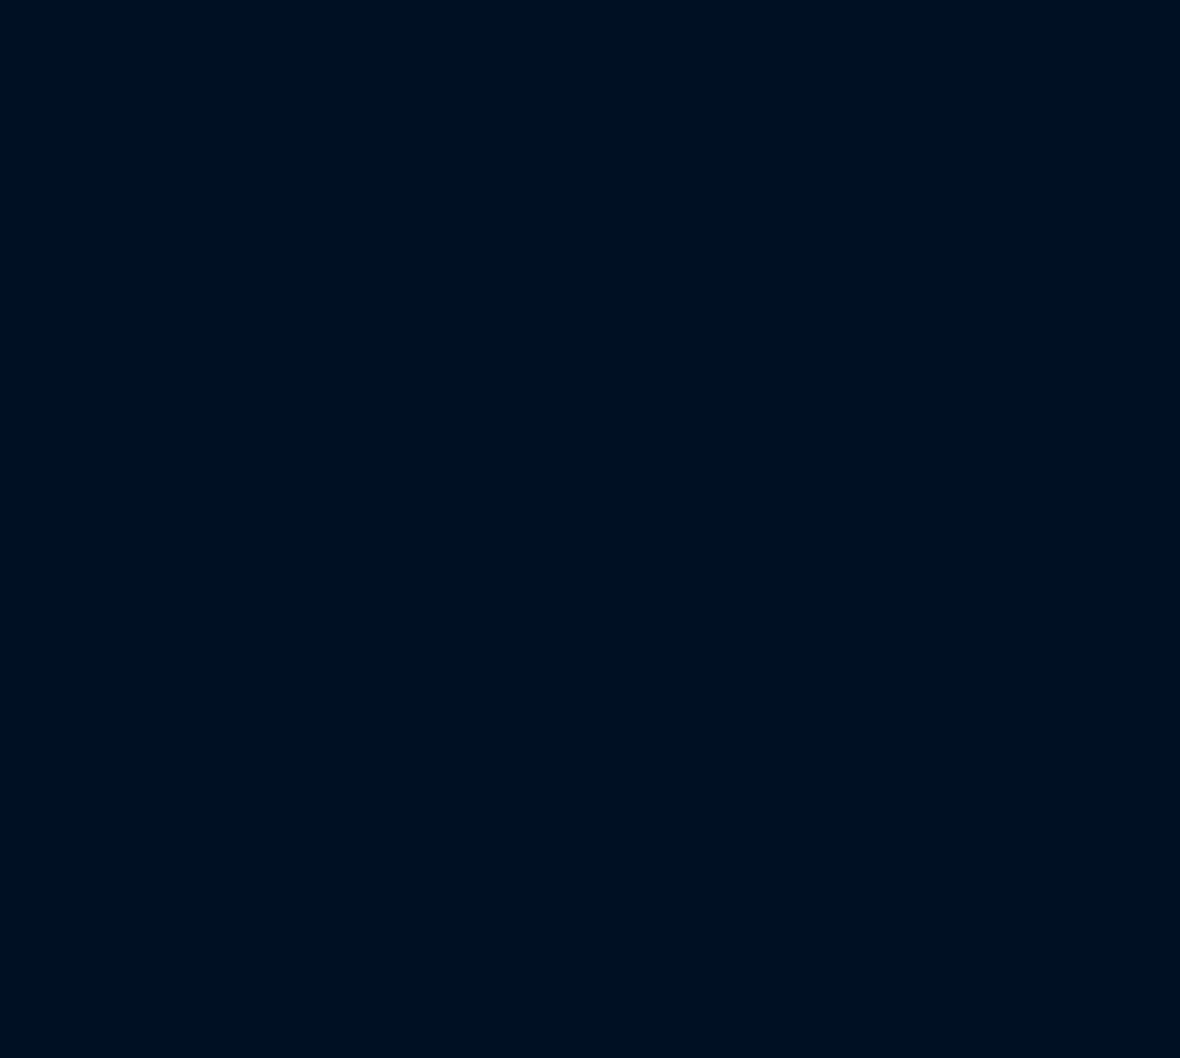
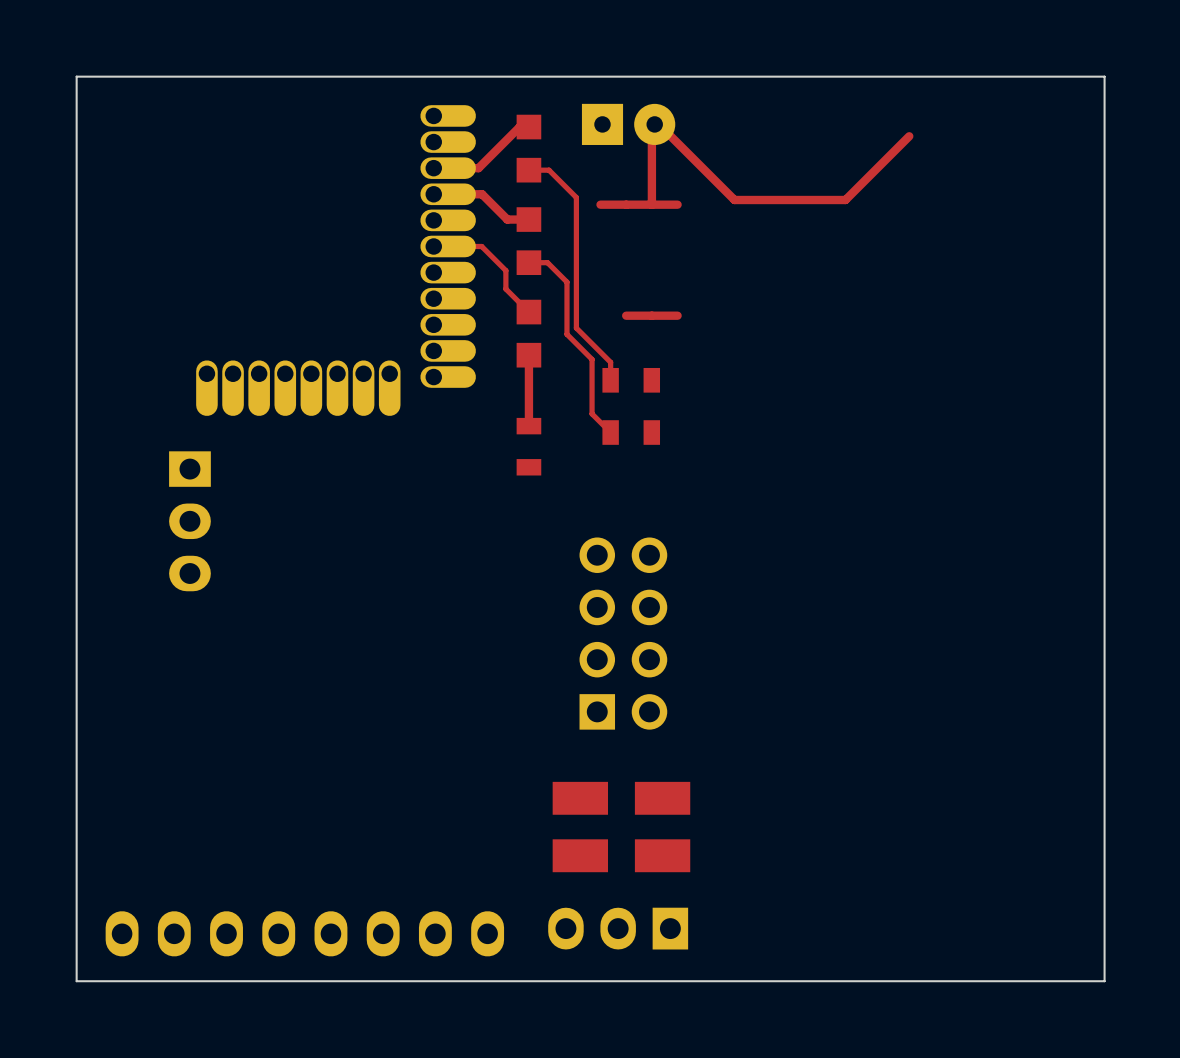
board edge: none -> (1104, 76) (1104, 981) (76, 981) (76, 76) (1104, 76)
part: none -> (628, 124)
top track: none -> (528, 127) (519, 127) (478, 168) (433, 168)
top track: none -> (909, 136) (845, 200) (734, 200) (658, 124) (654, 124) (651, 127) (651, 204)
part: none -> (528, 148)
top track: none -> (528, 170) (549, 170) (576, 197) (576, 328) (610, 362) (610, 380)
top track: none -> (433, 194) (482, 194) (507, 219) (528, 219)
top track: none -> (677, 204) (600, 204)
part: none -> (528, 241)
top track: none -> (433, 246) (481, 246) (505, 270) (505, 289) (528, 312) (528, 306)
part: none -> (336, 260)
top track: none -> (528, 262) (547, 262) (566, 282) (566, 334) (592, 359) (592, 413) (610, 432)
top track: none -> (677, 315) (626, 315)
part: none -> (528, 333)
top track: none -> (528, 355) (528, 426)
part: none -> (631, 380)
part: none -> (631, 432)
part: none -> (528, 446)
part: none -> (189, 521)
part: none -> (623, 633)
part: none -> (580, 827)
part: none -> (662, 827)
part: none -> (618, 928)
part: none -> (304, 933)

